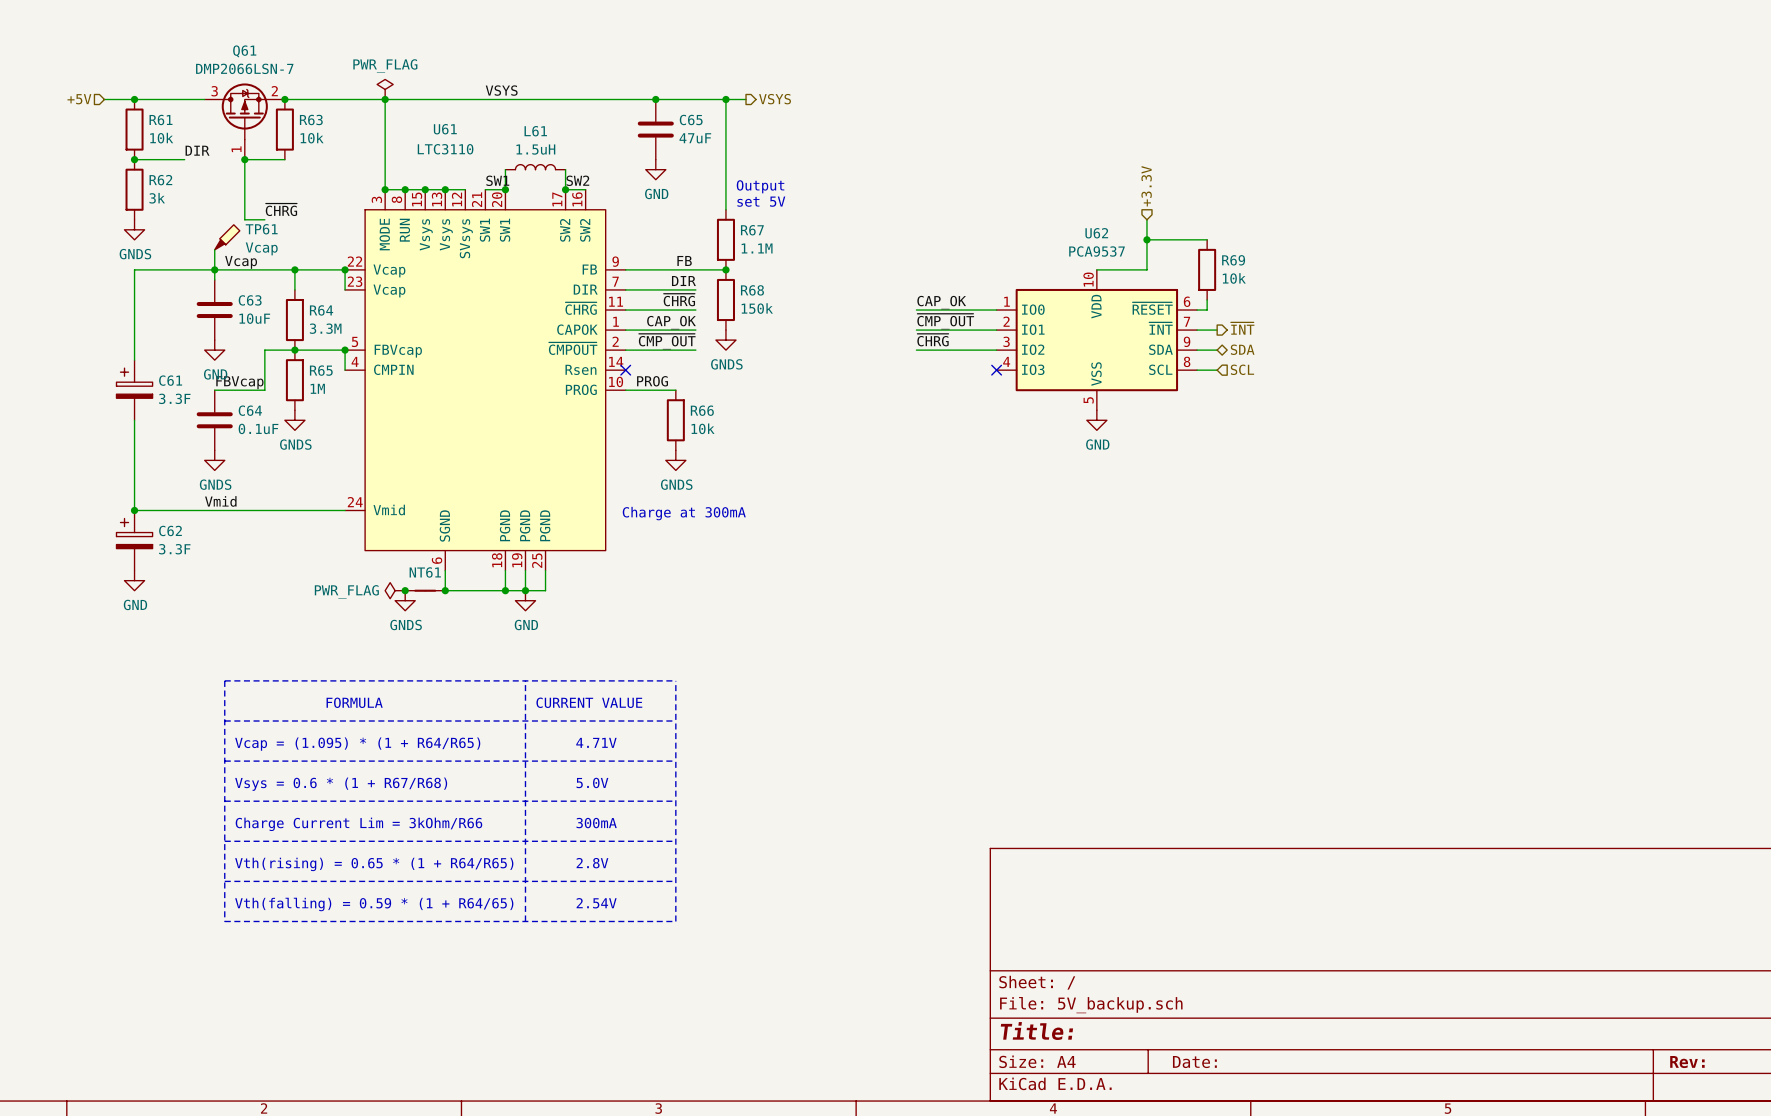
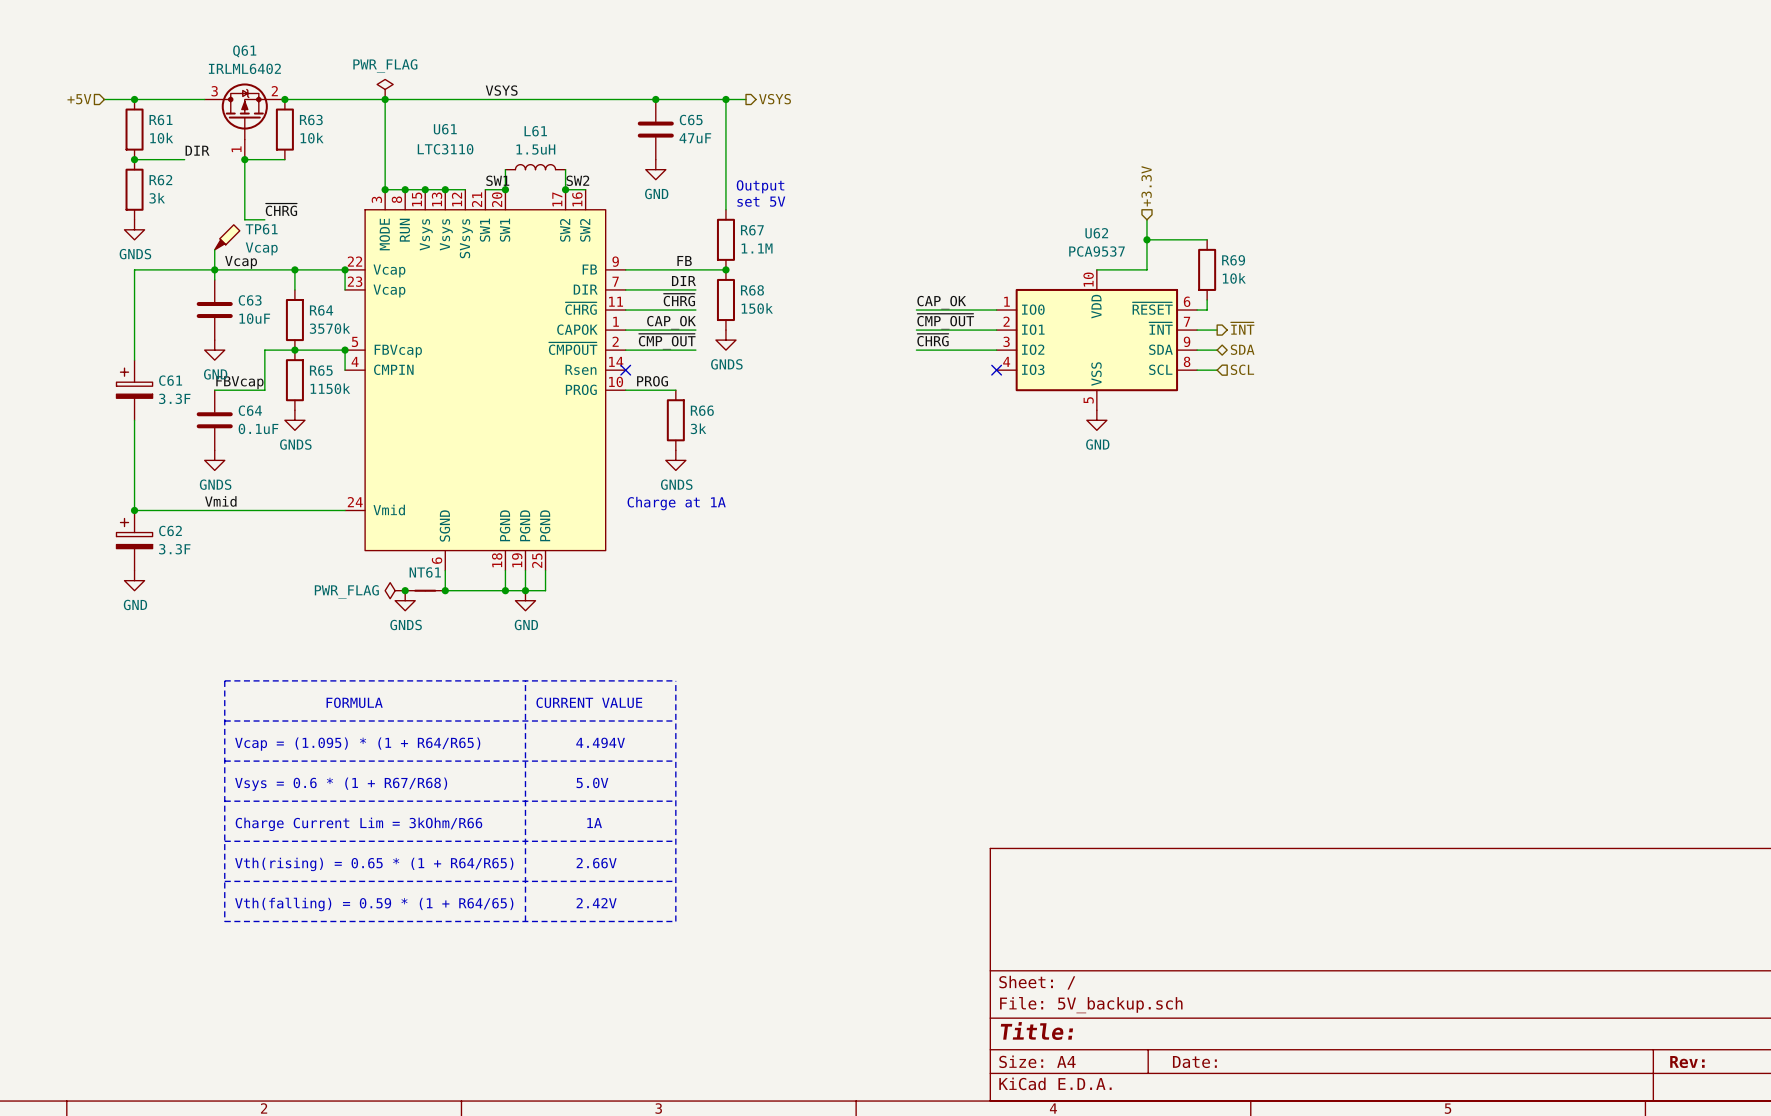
Q61 value: DMP2066LSN-7 (244, 68) -> IRLML6402 (244, 68)
R64 value: 3.3M (325, 328) -> 3570k (330, 328)
R65 value: 1M (317, 388) -> 1150k (330, 388)
R66 value: 10k (703, 428) -> 3k (698, 428)
text: Charge at 300mA (684, 513) -> Charge at 1A (676, 503)
text: 4.71V (596, 742) -> 4.494V (600, 742)
text: none -> 1A (594, 823)
text: 300mA (596, 823) -> none
text: 2.8V (592, 863) -> 2.66V (596, 863)
text: 2.54V (596, 903) -> 2.42V (596, 903)

